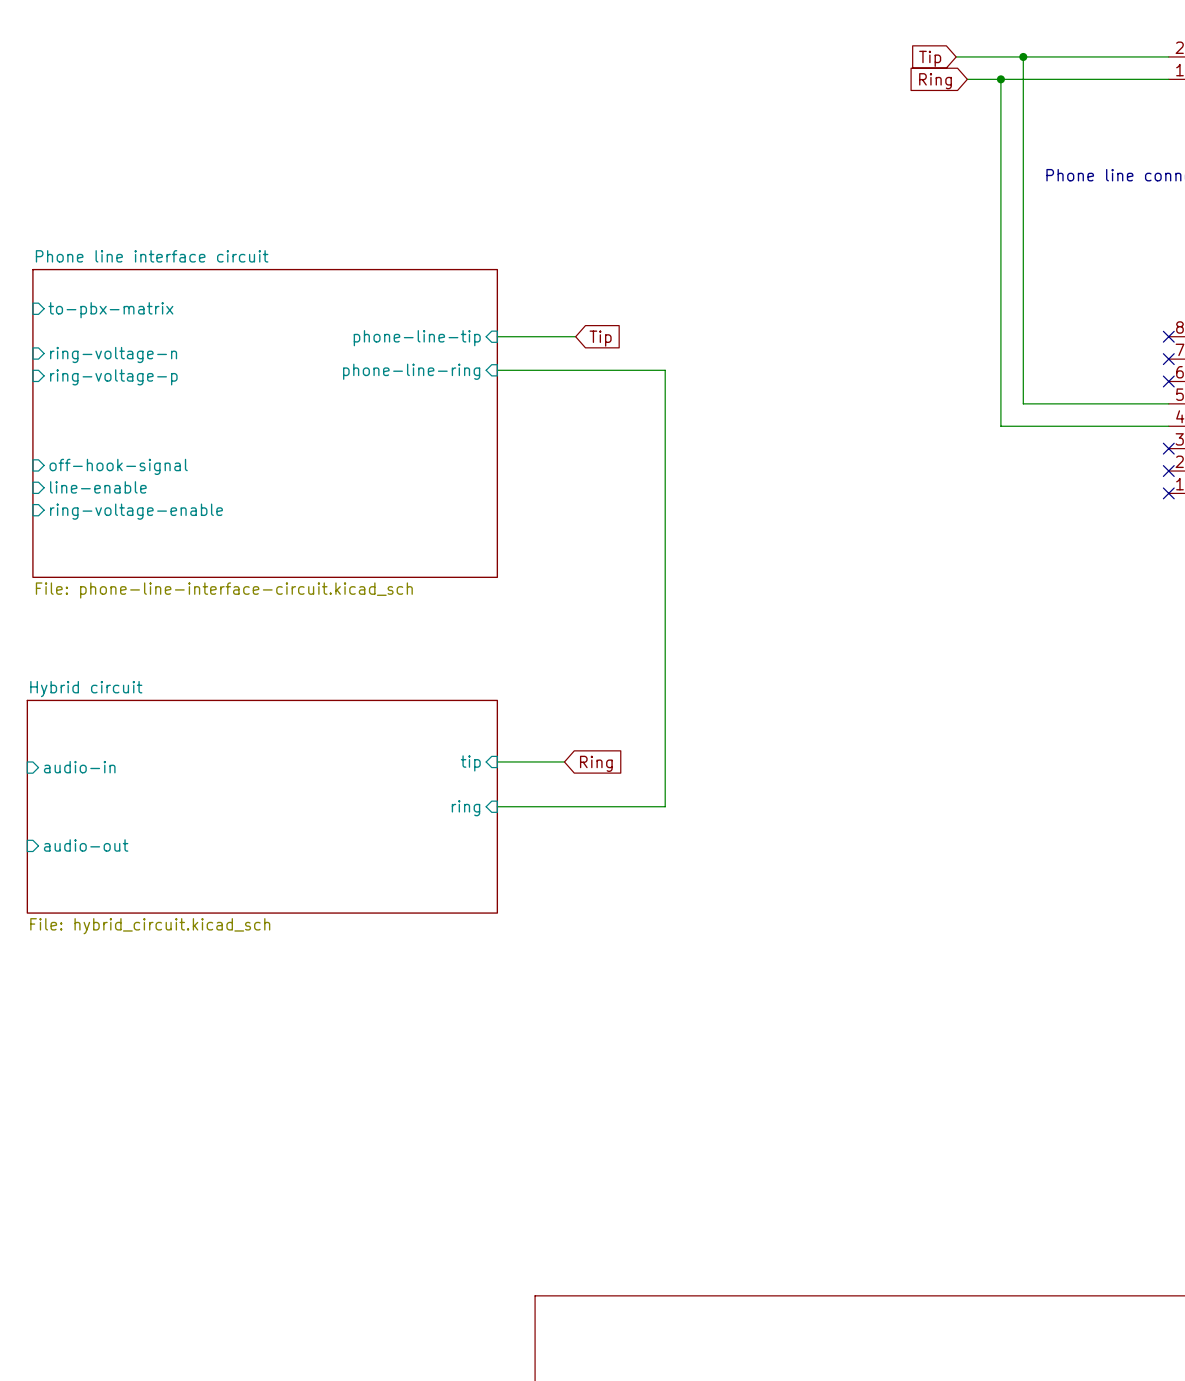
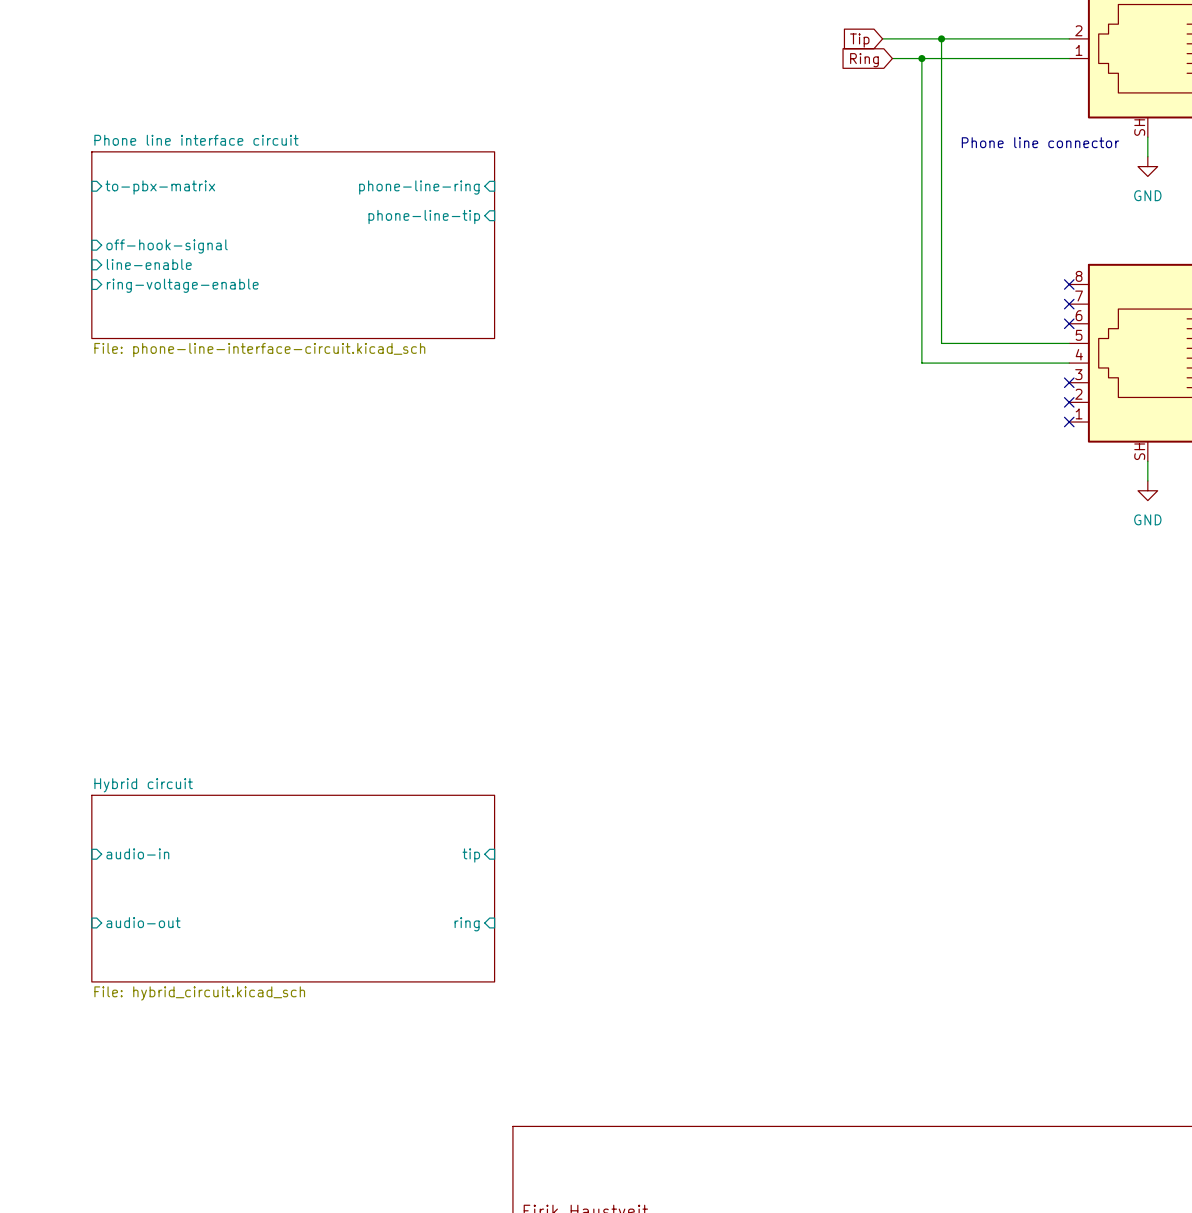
sheet Phone line interface circuit: none -> File: phone-line-interface-circuit.kicad_sch (293, 245)
sheet pin position: to-pbx-matrix (110, 310) -> to-pbx-matrix (160, 187)
wire: (497, 336) (575, 336) -> none
sheet pin position: phone-line-tip (417, 338) -> phone-line-tip (424, 216)
global label: Tip (600, 338) -> none
sheet pin: ring-voltage-n (113, 354) -> none
wire: (497, 370) (665, 370) (665, 806) (497, 806) -> none
sheet pin position: phone-line-ring (411, 371) -> phone-line-ring (419, 187)
sheet pin: ring-voltage-p (113, 377) -> none
sheet Phone line interface circuit: File: phone-line-interface-circuit.kicad_sch (265, 423) -> none
sheet pin position: off-hook-signal (118, 466) -> off-hook-signal (167, 246)
sheet pin position: line-enable (98, 487) -> line-enable (149, 264)
sheet pin position: ring-voltage-enable (136, 511) -> ring-voltage-enable (182, 285)
wire: (497, 761) (564, 761) -> none
sheet pin: tip (470, 763) -> none
global label: Ring (596, 763) -> none
sheet pin position: audio-in (79, 767) -> audio-in (137, 853)
sheet Hybrid circuit: File: hybrid_circuit.kicad_sch (262, 806) -> none
sheet pin: ring (466, 808) -> none
sheet pin position: audio-out (86, 845) -> audio-out (143, 922)
sheet pin: none -> tip (471, 855)
sheet Hybrid circuit: none -> File: hybrid_circuit.kicad_sch (293, 888)
sheet pin: none -> ring (467, 924)

